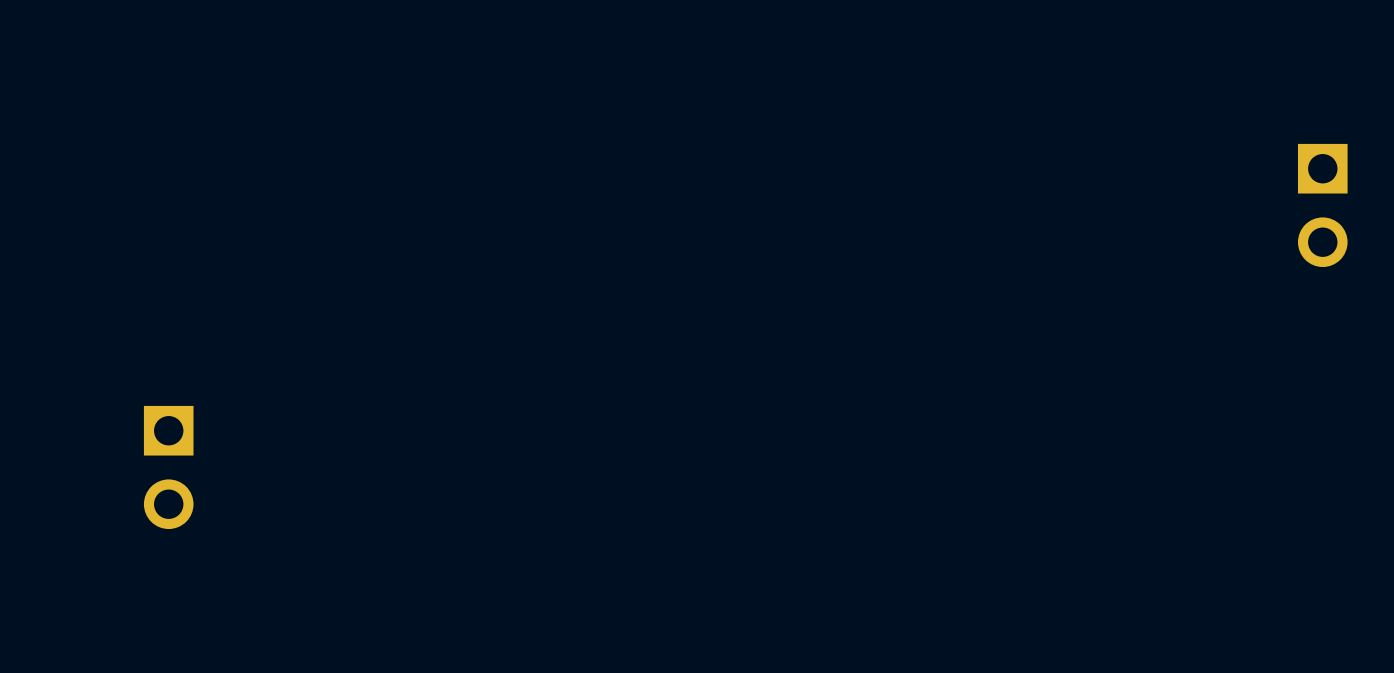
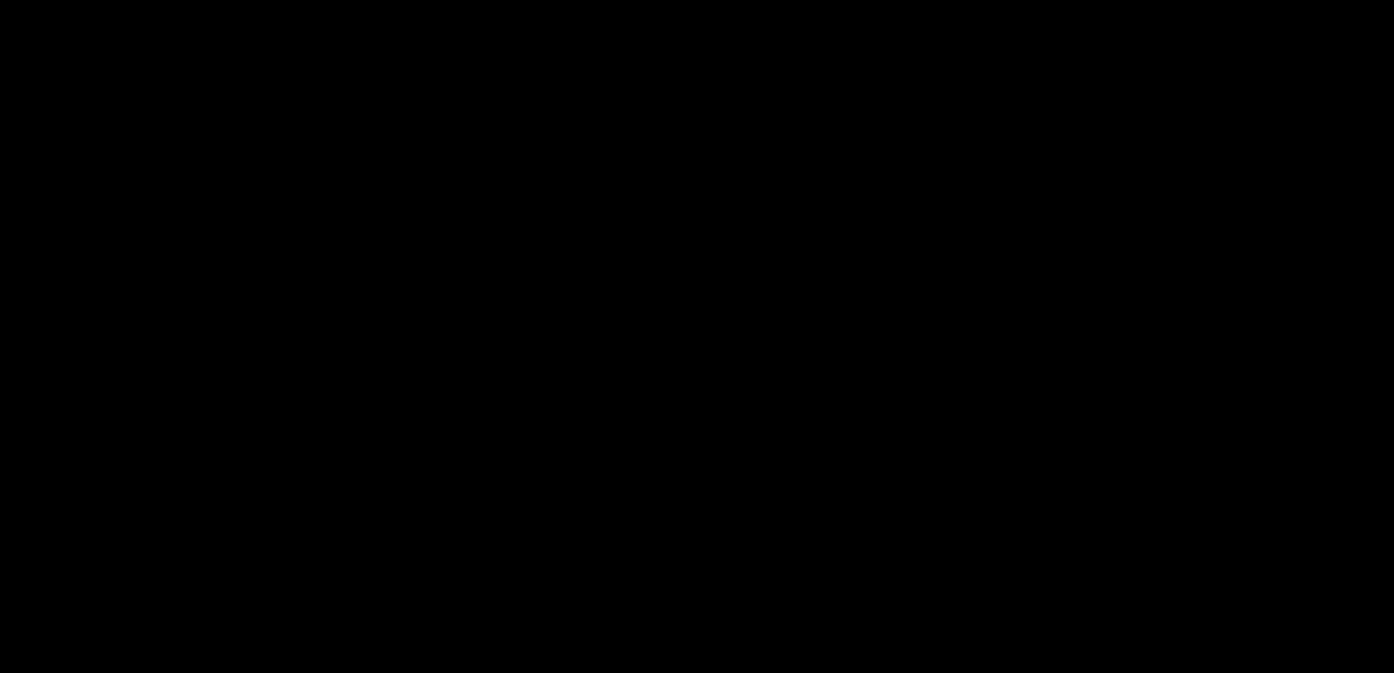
part: (1322, 205) -> none
part: (168, 467) -> none

